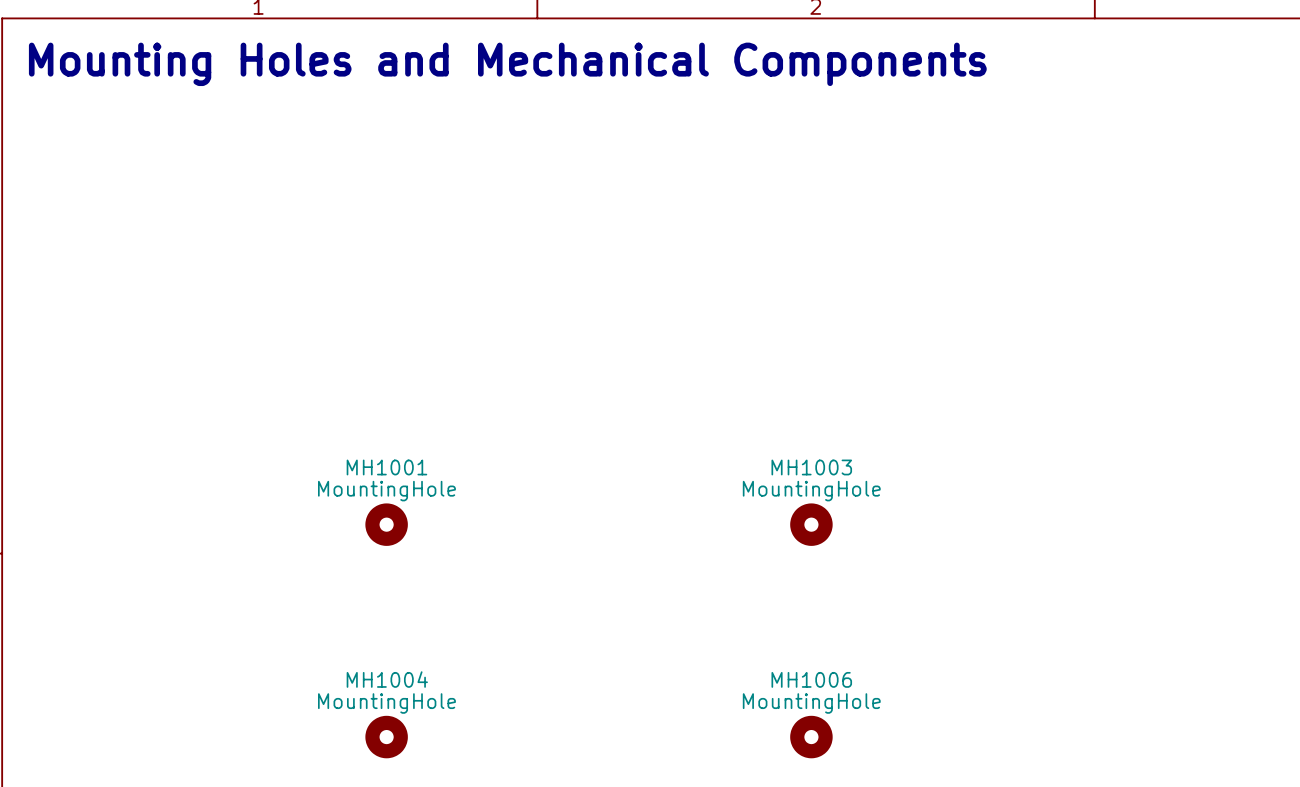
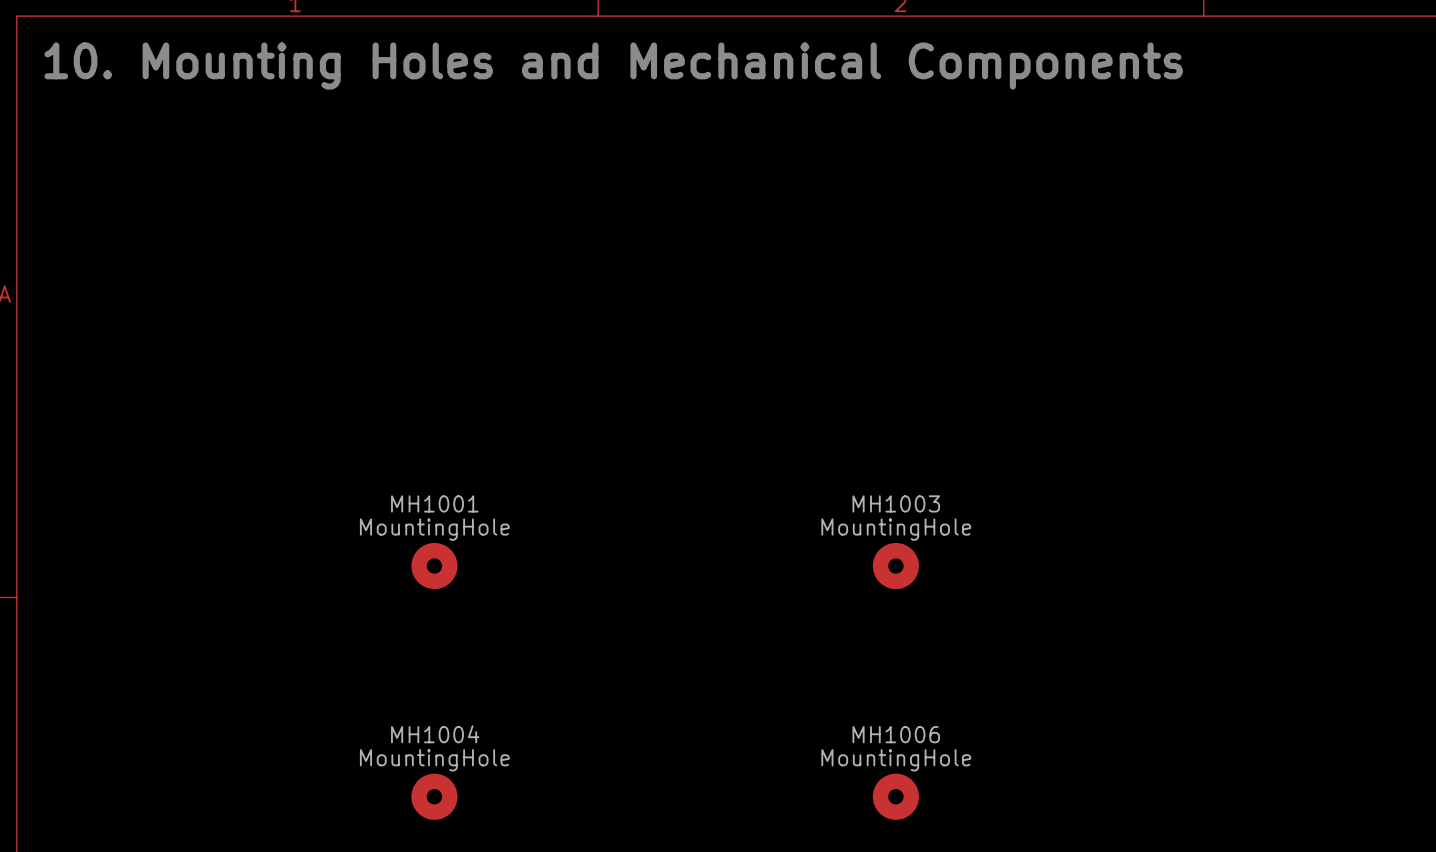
text: Mounting Holes and Mechanical Components (507, 64) -> 10. Mounting Holes and Mechanical Components (613, 66)

